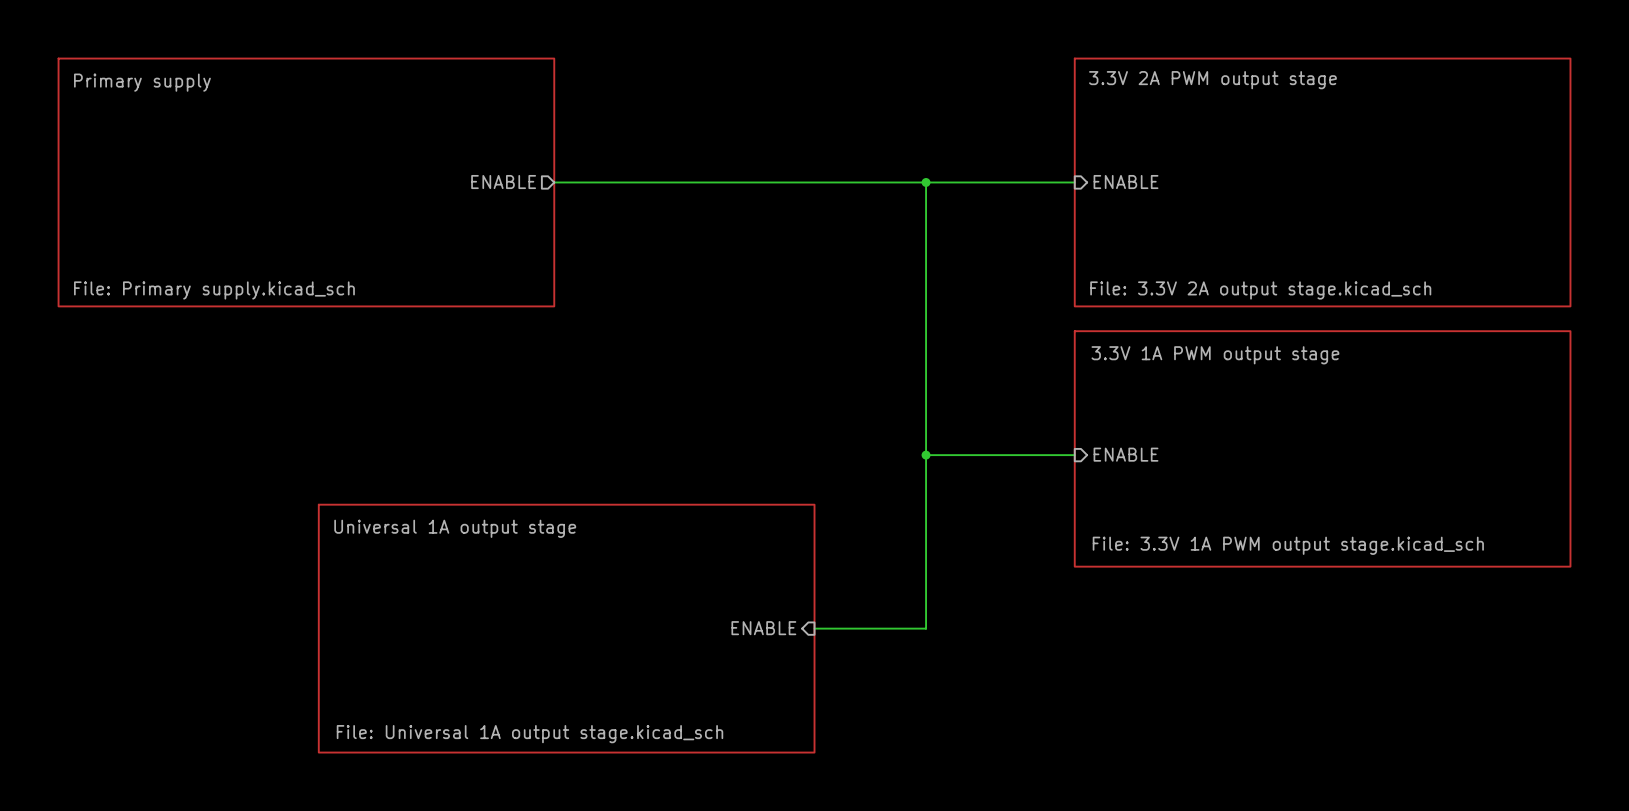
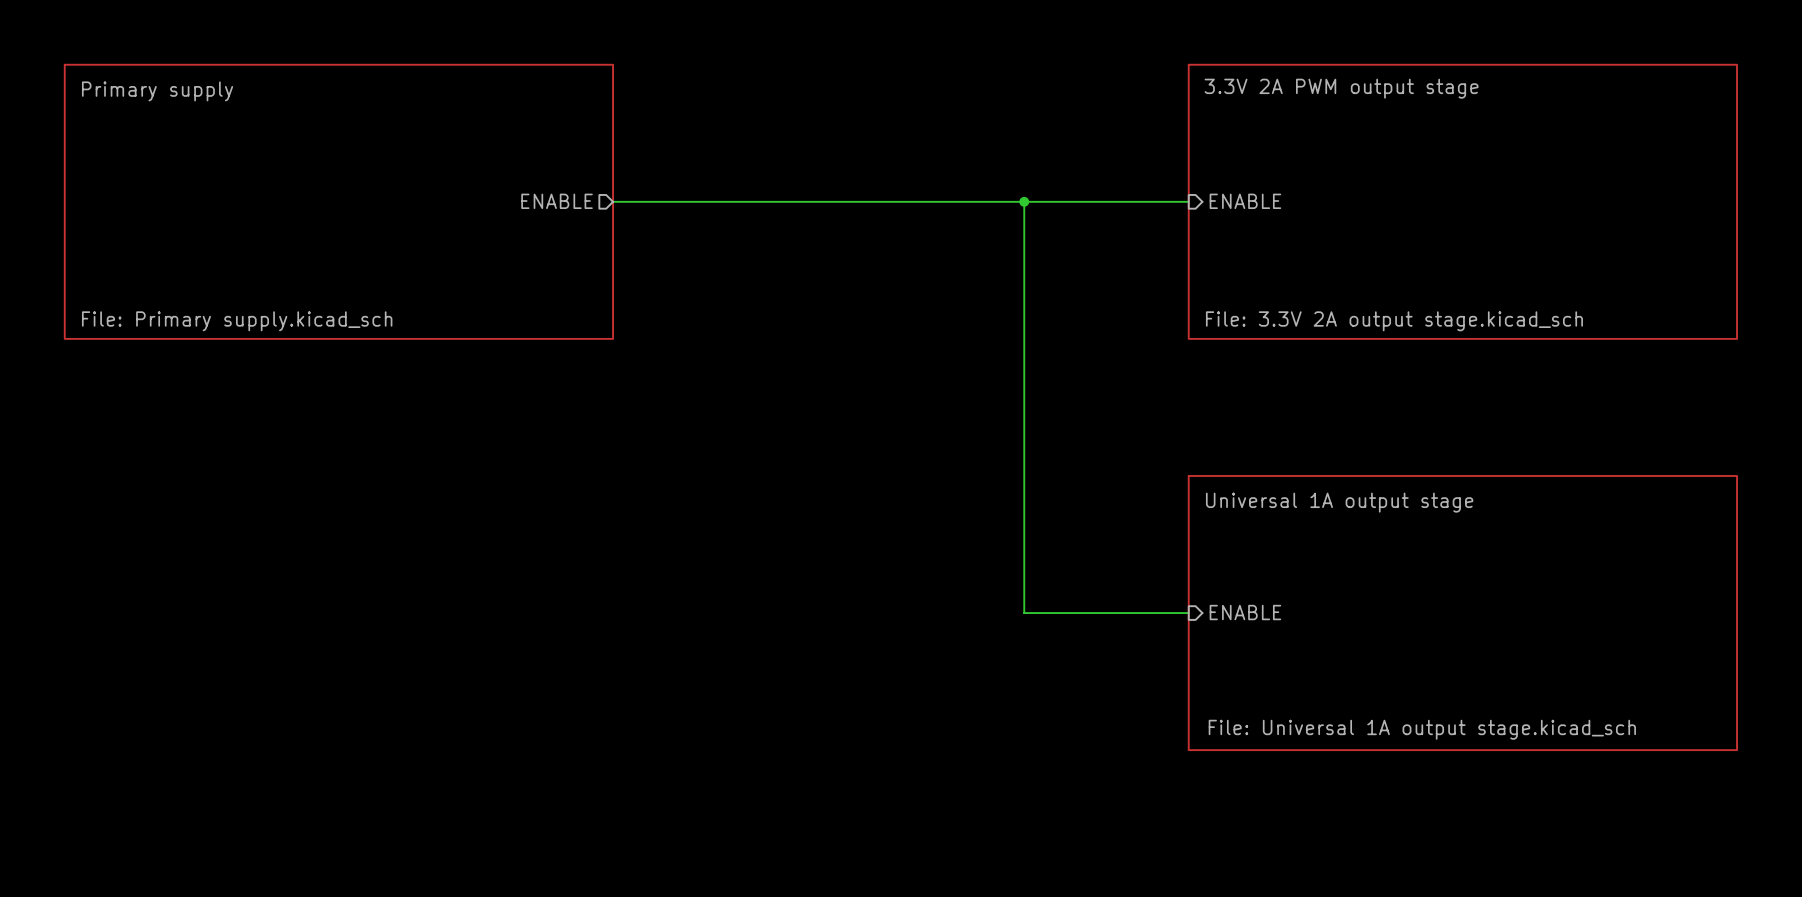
sheet 3.3V 1A PWM output stage: File: 3.3V 1A PWM output stage.kicad_sch (1322, 448) -> none
sheet pin position: ENABLE (1126, 454) -> ENABLE (1245, 612)
wire: (926, 455) (1074, 455) -> none
junction: (926, 455) -> none
wire: (926, 554) (926, 628) (814, 628) -> (1024, 613) (1188, 613)
sheet Universal 1A output stage position: (566, 628) -> (1462, 613)
sheet pin: ENABLE (763, 628) -> none

